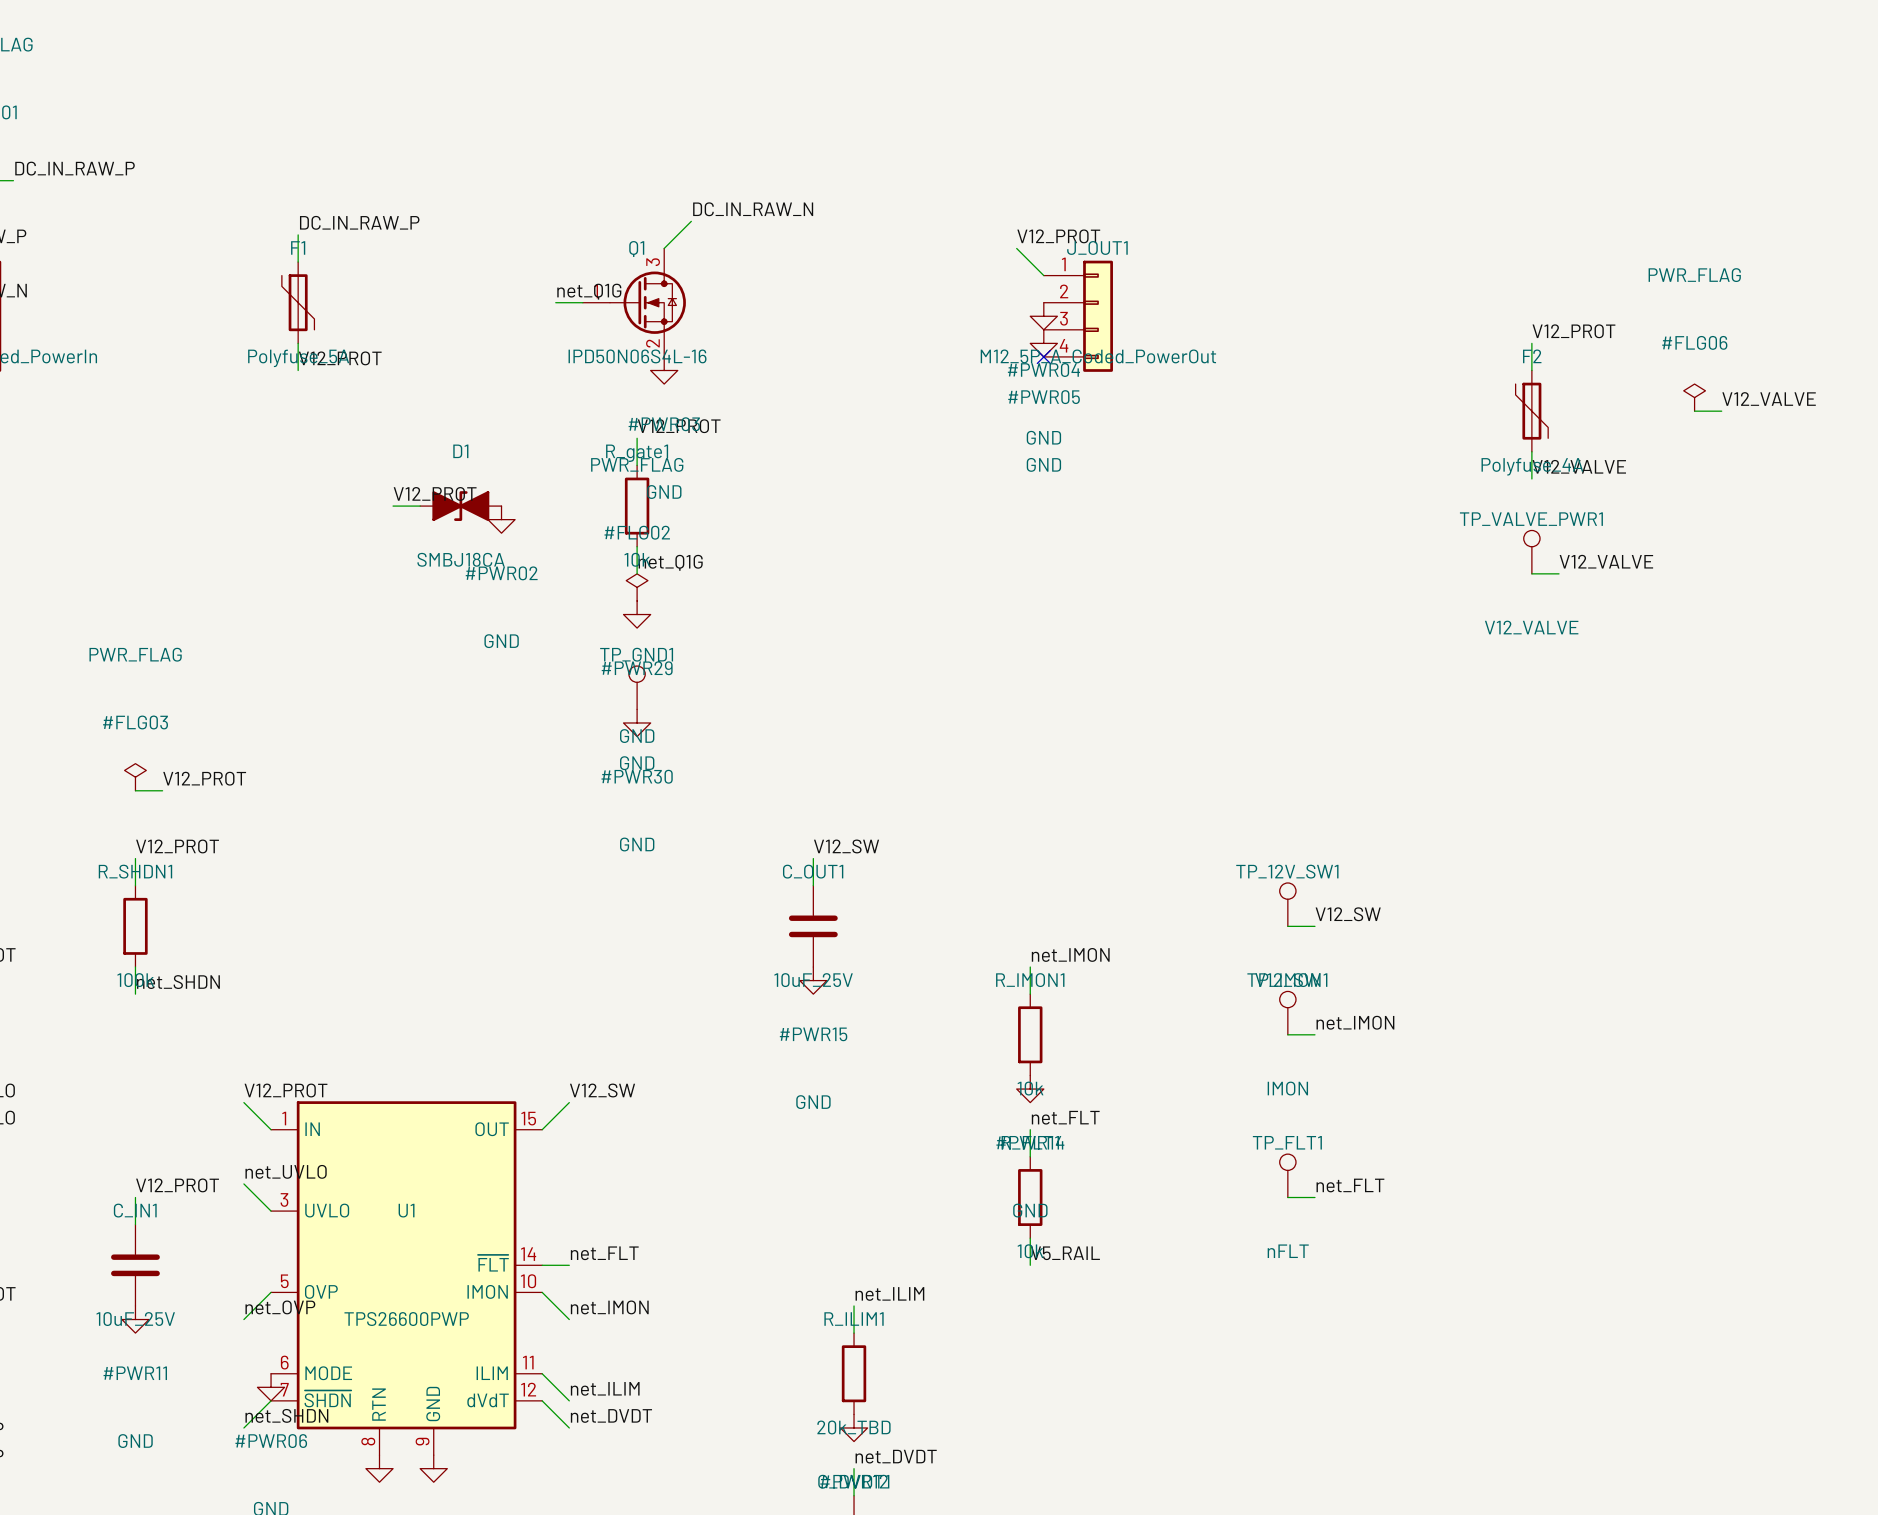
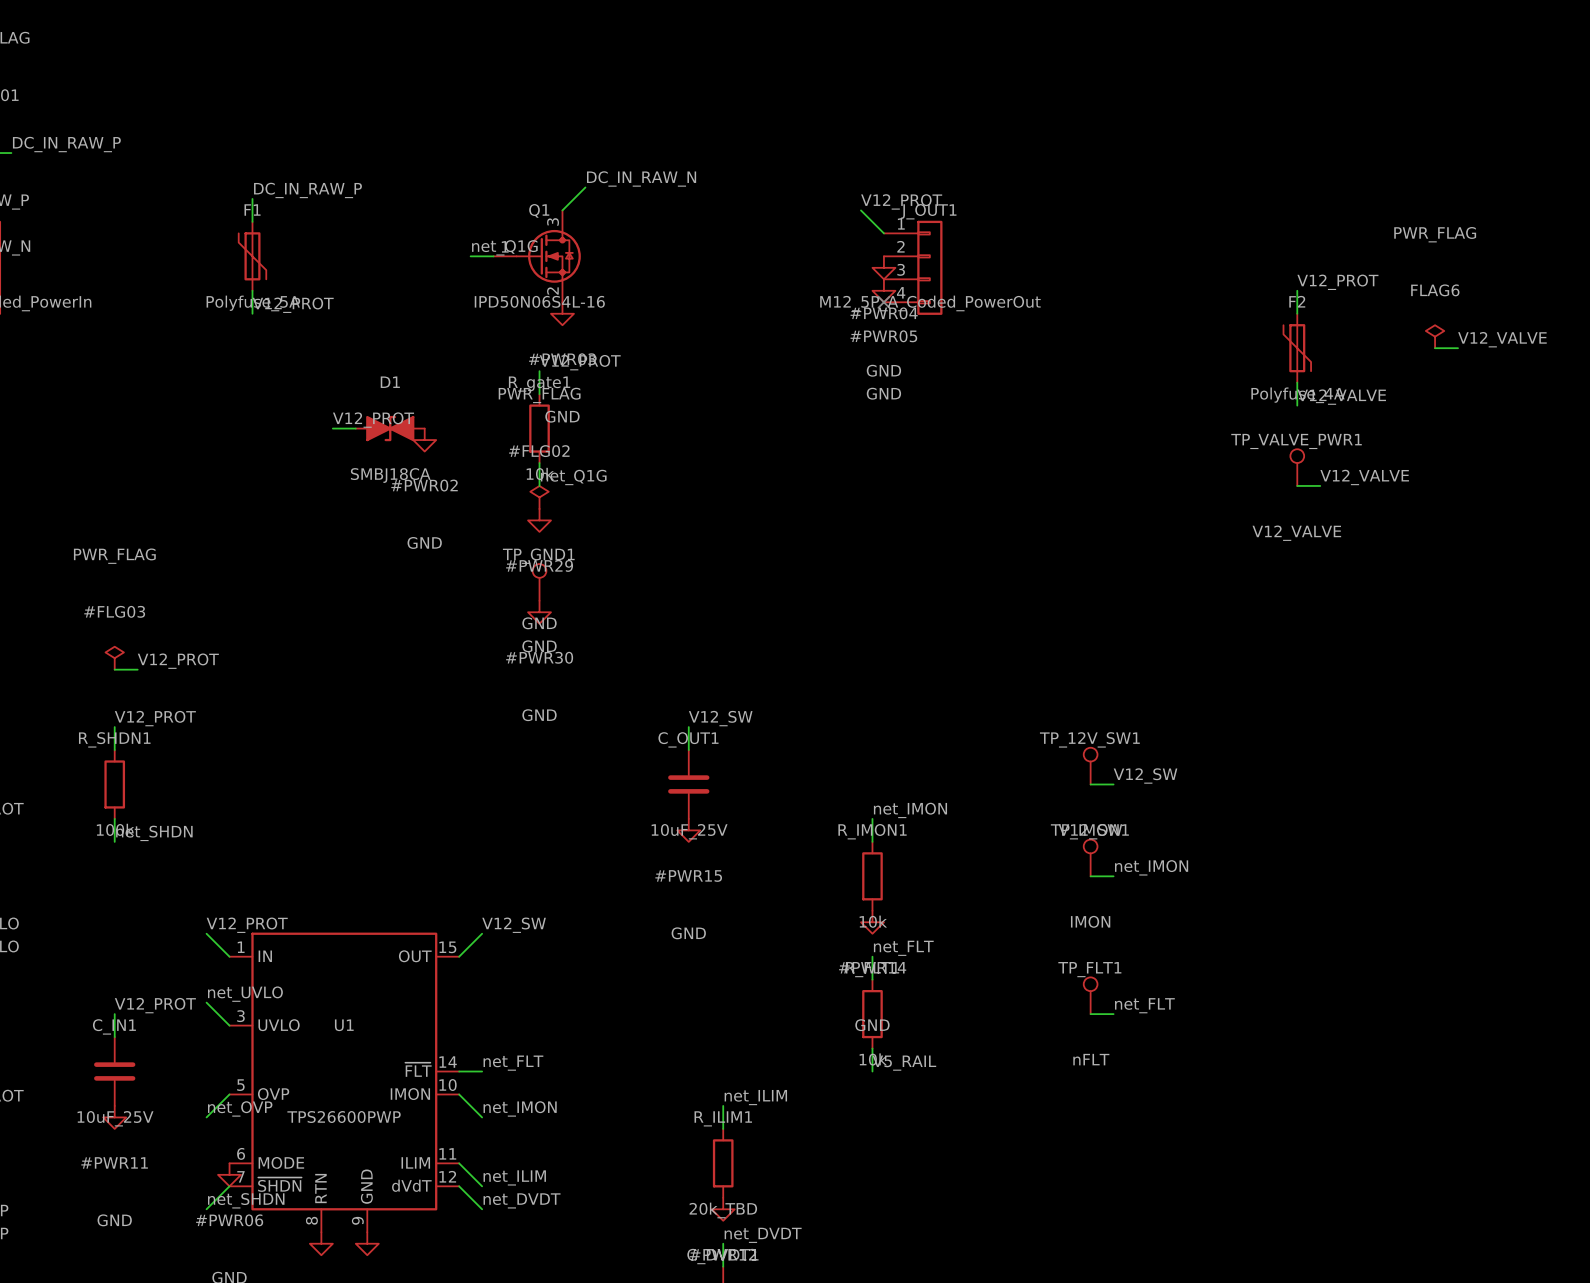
#FLG06 name: #FLG06 (1694, 342) -> FLAG6 (1435, 290)

